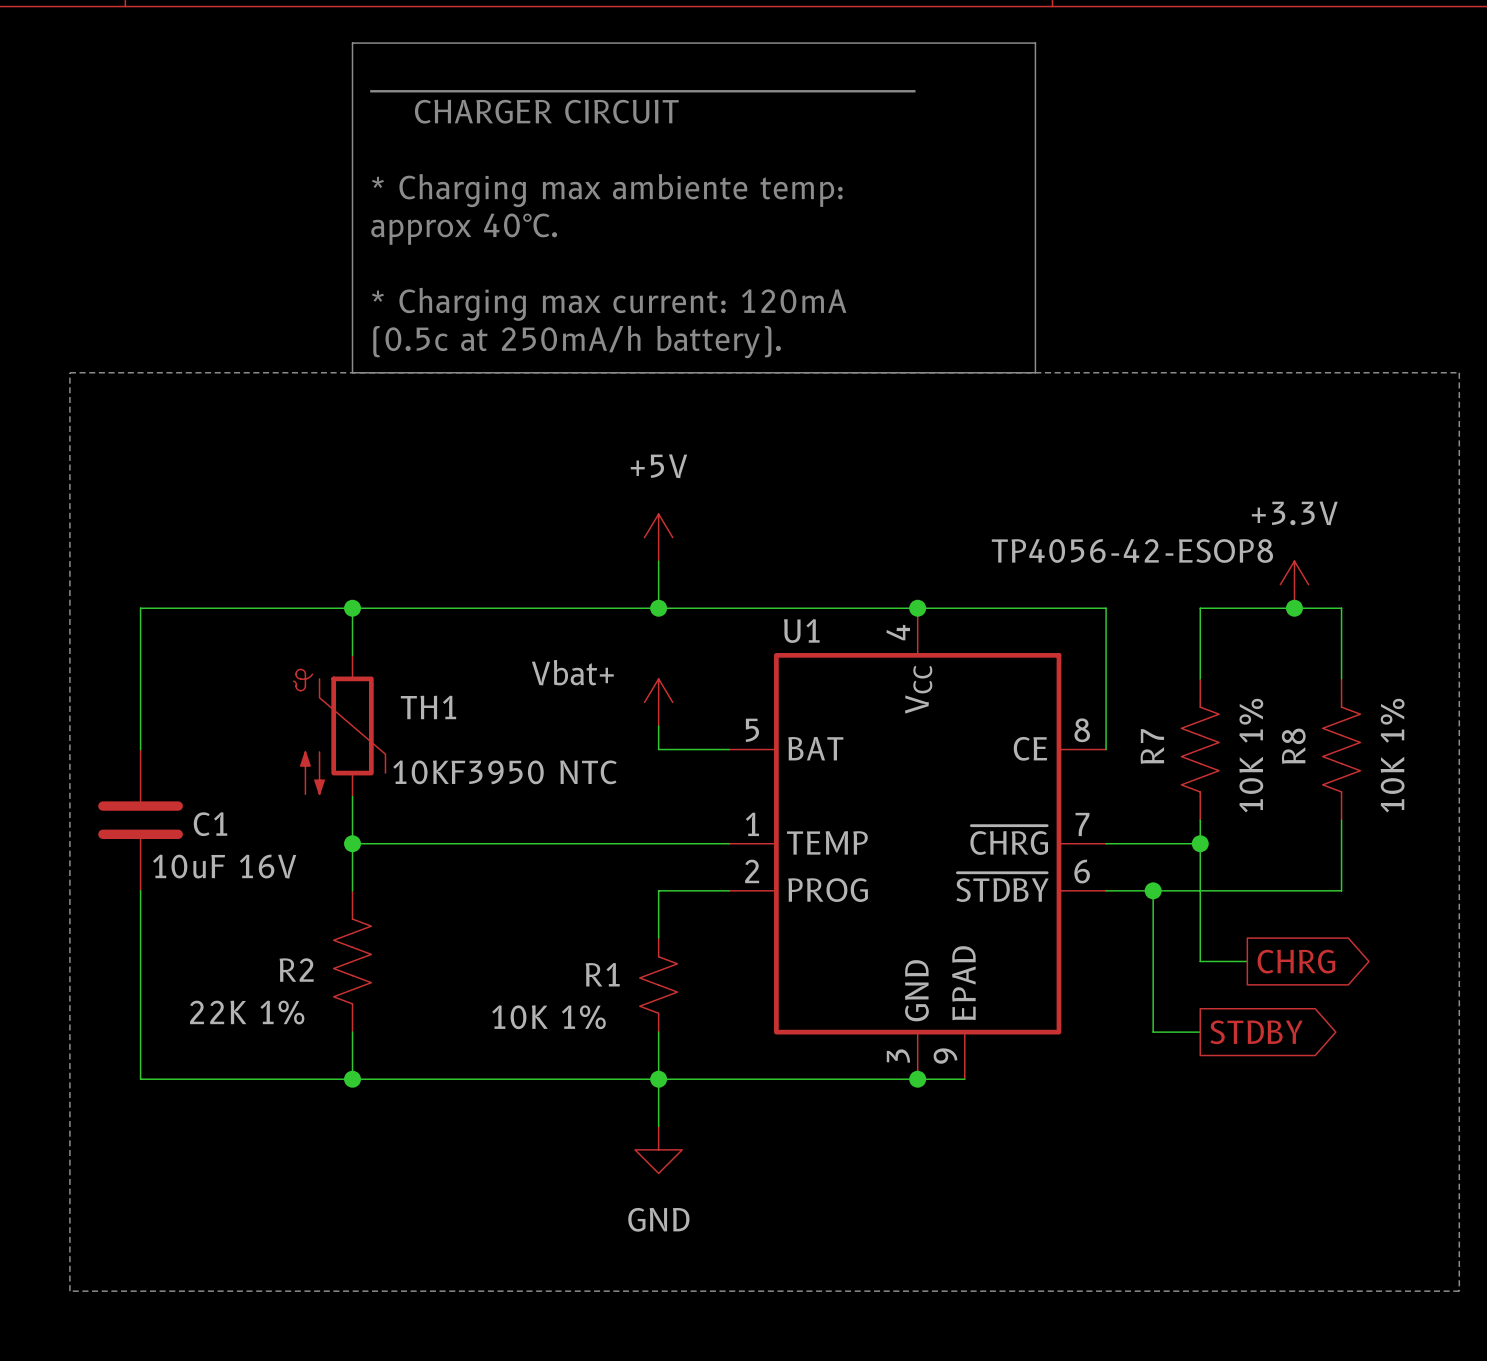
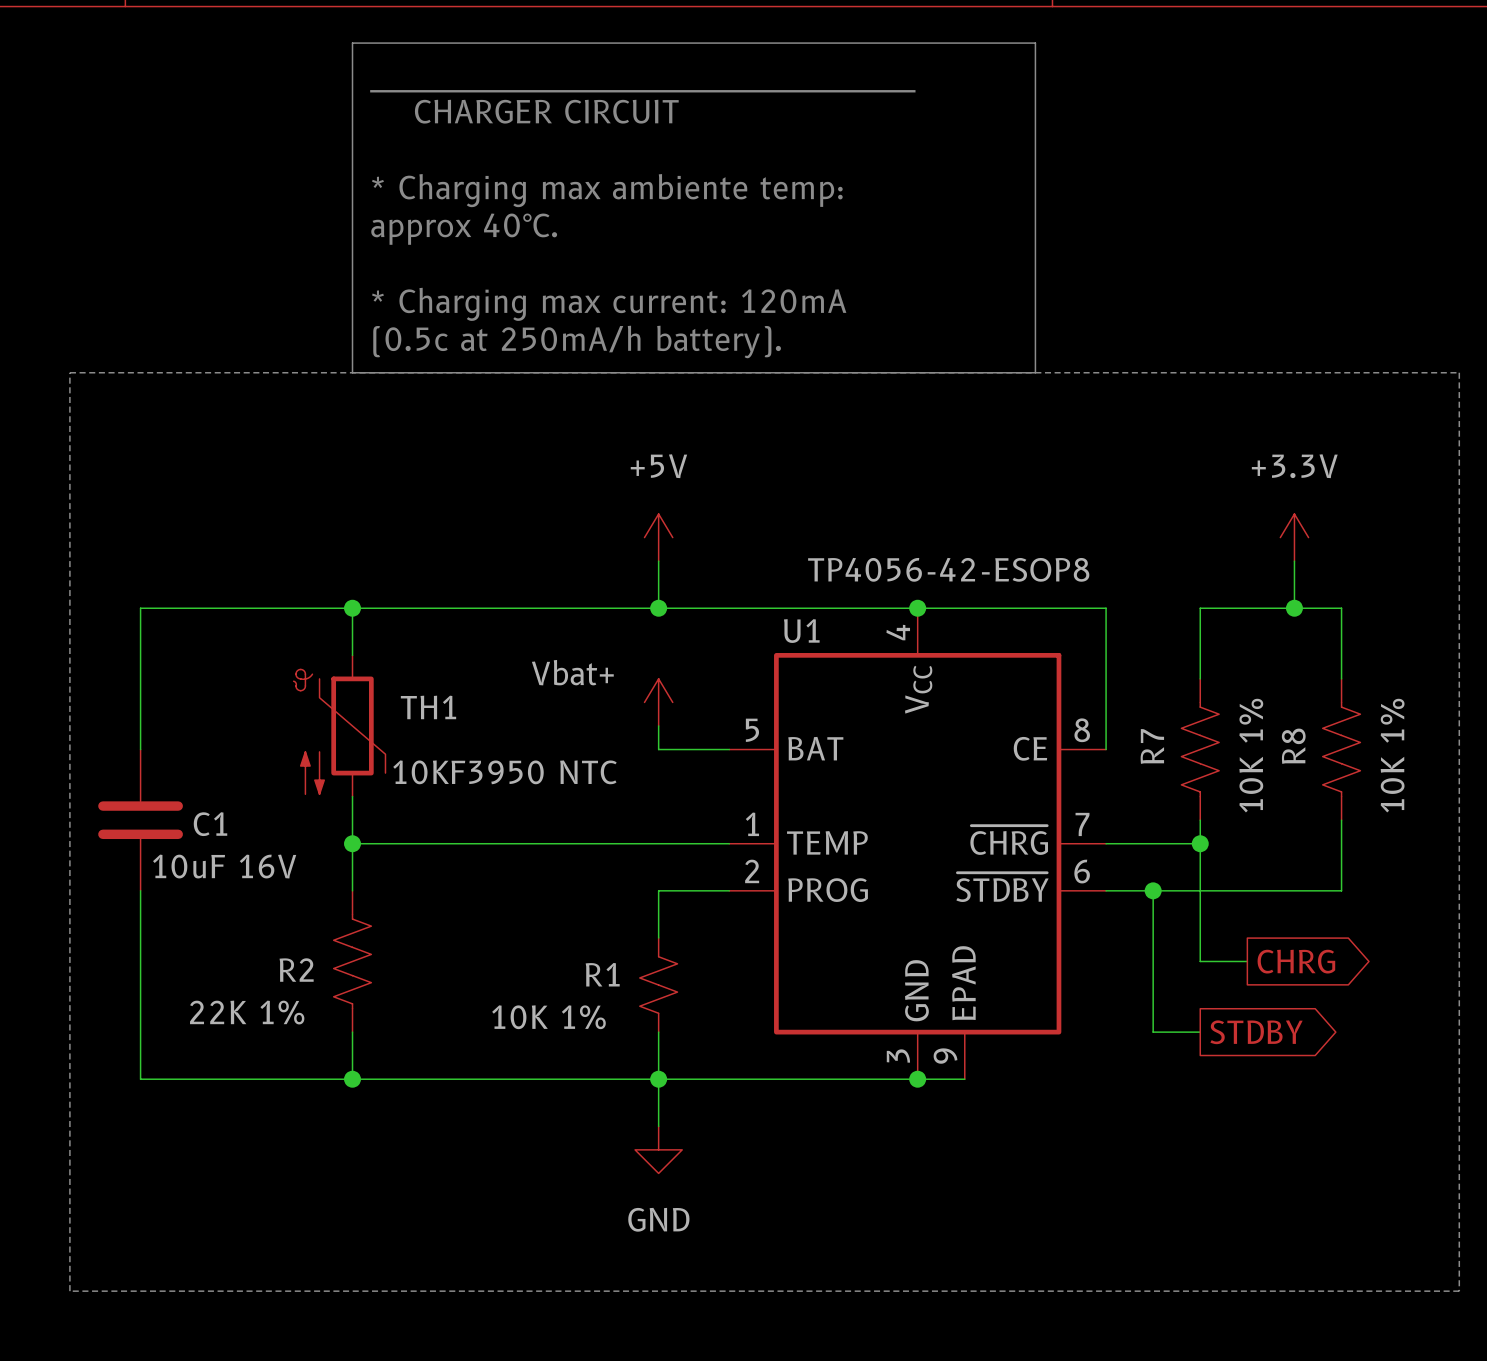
U1 value position: TP4056-42-ESOP8 (1132, 550) -> TP4056-42-ESOP8 (948, 569)
power symbol position: +3.3V (1294, 584) -> +3.3V (1294, 537)

